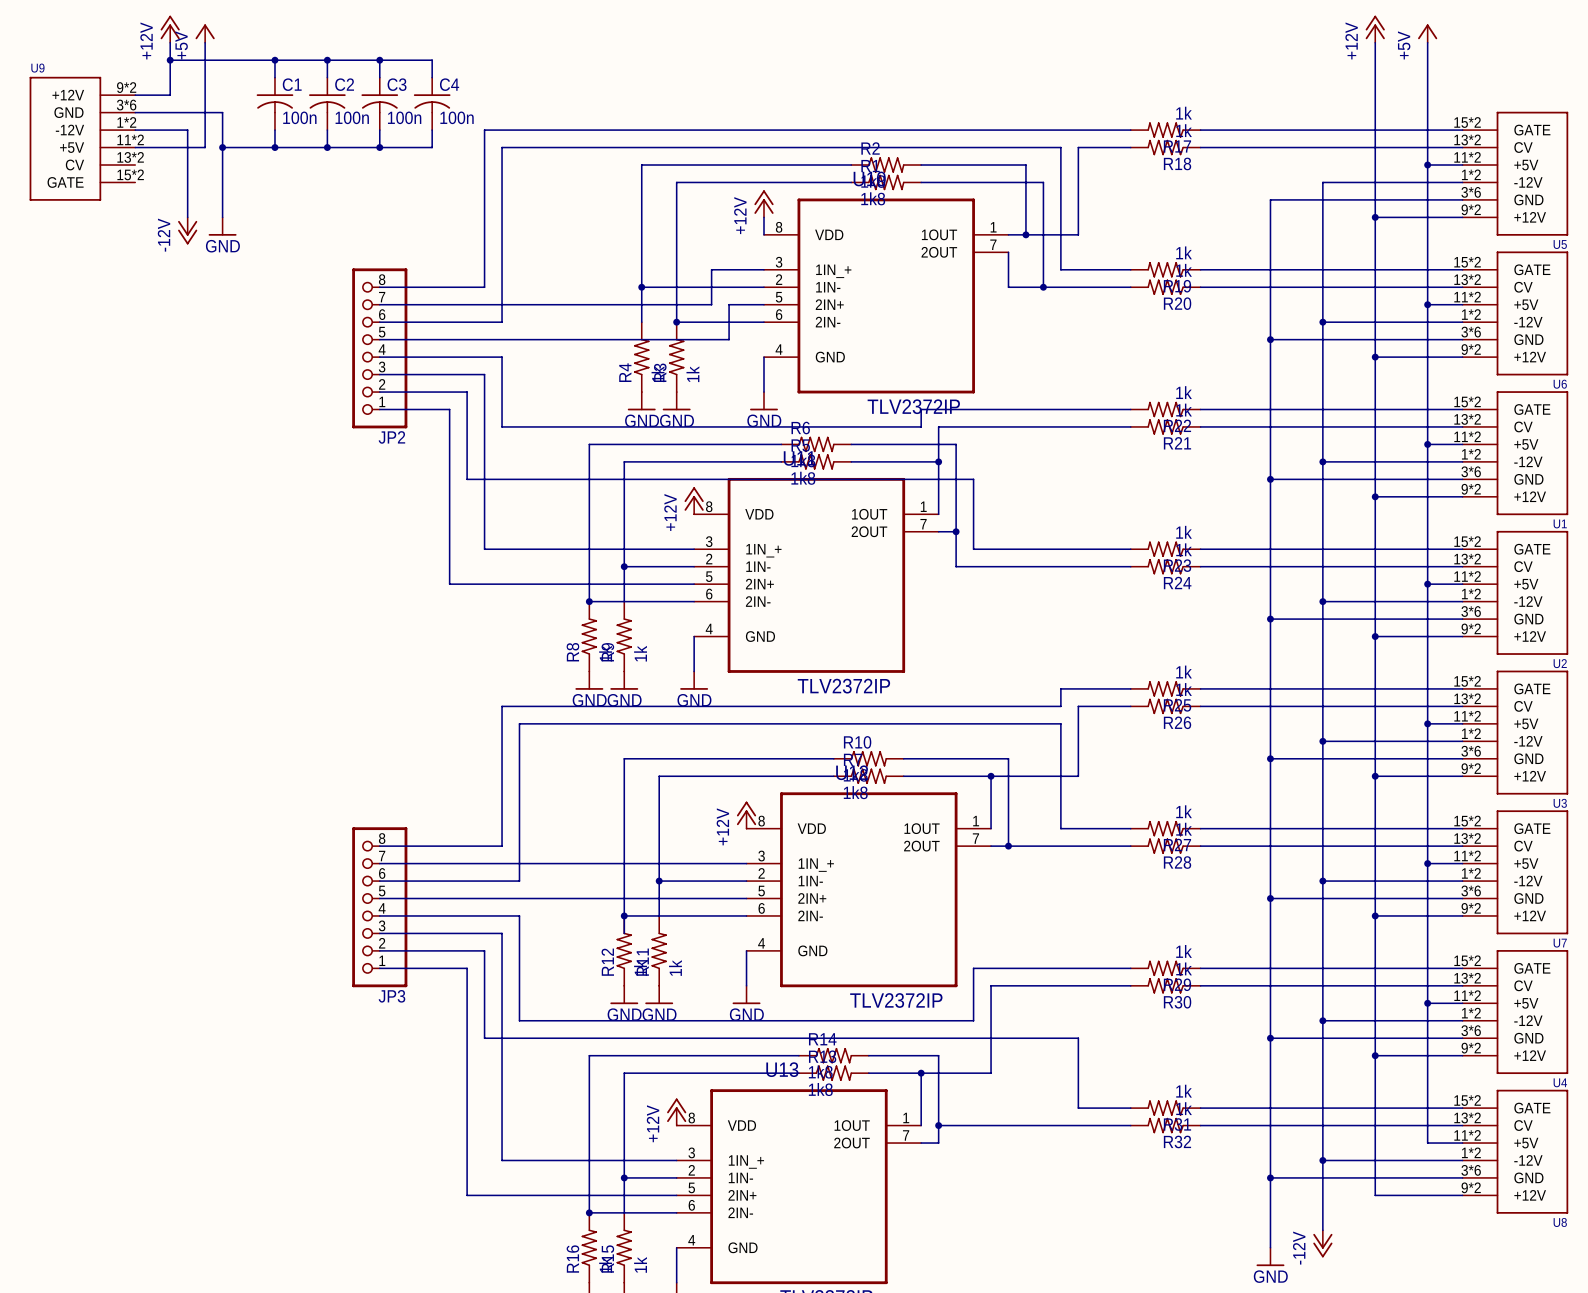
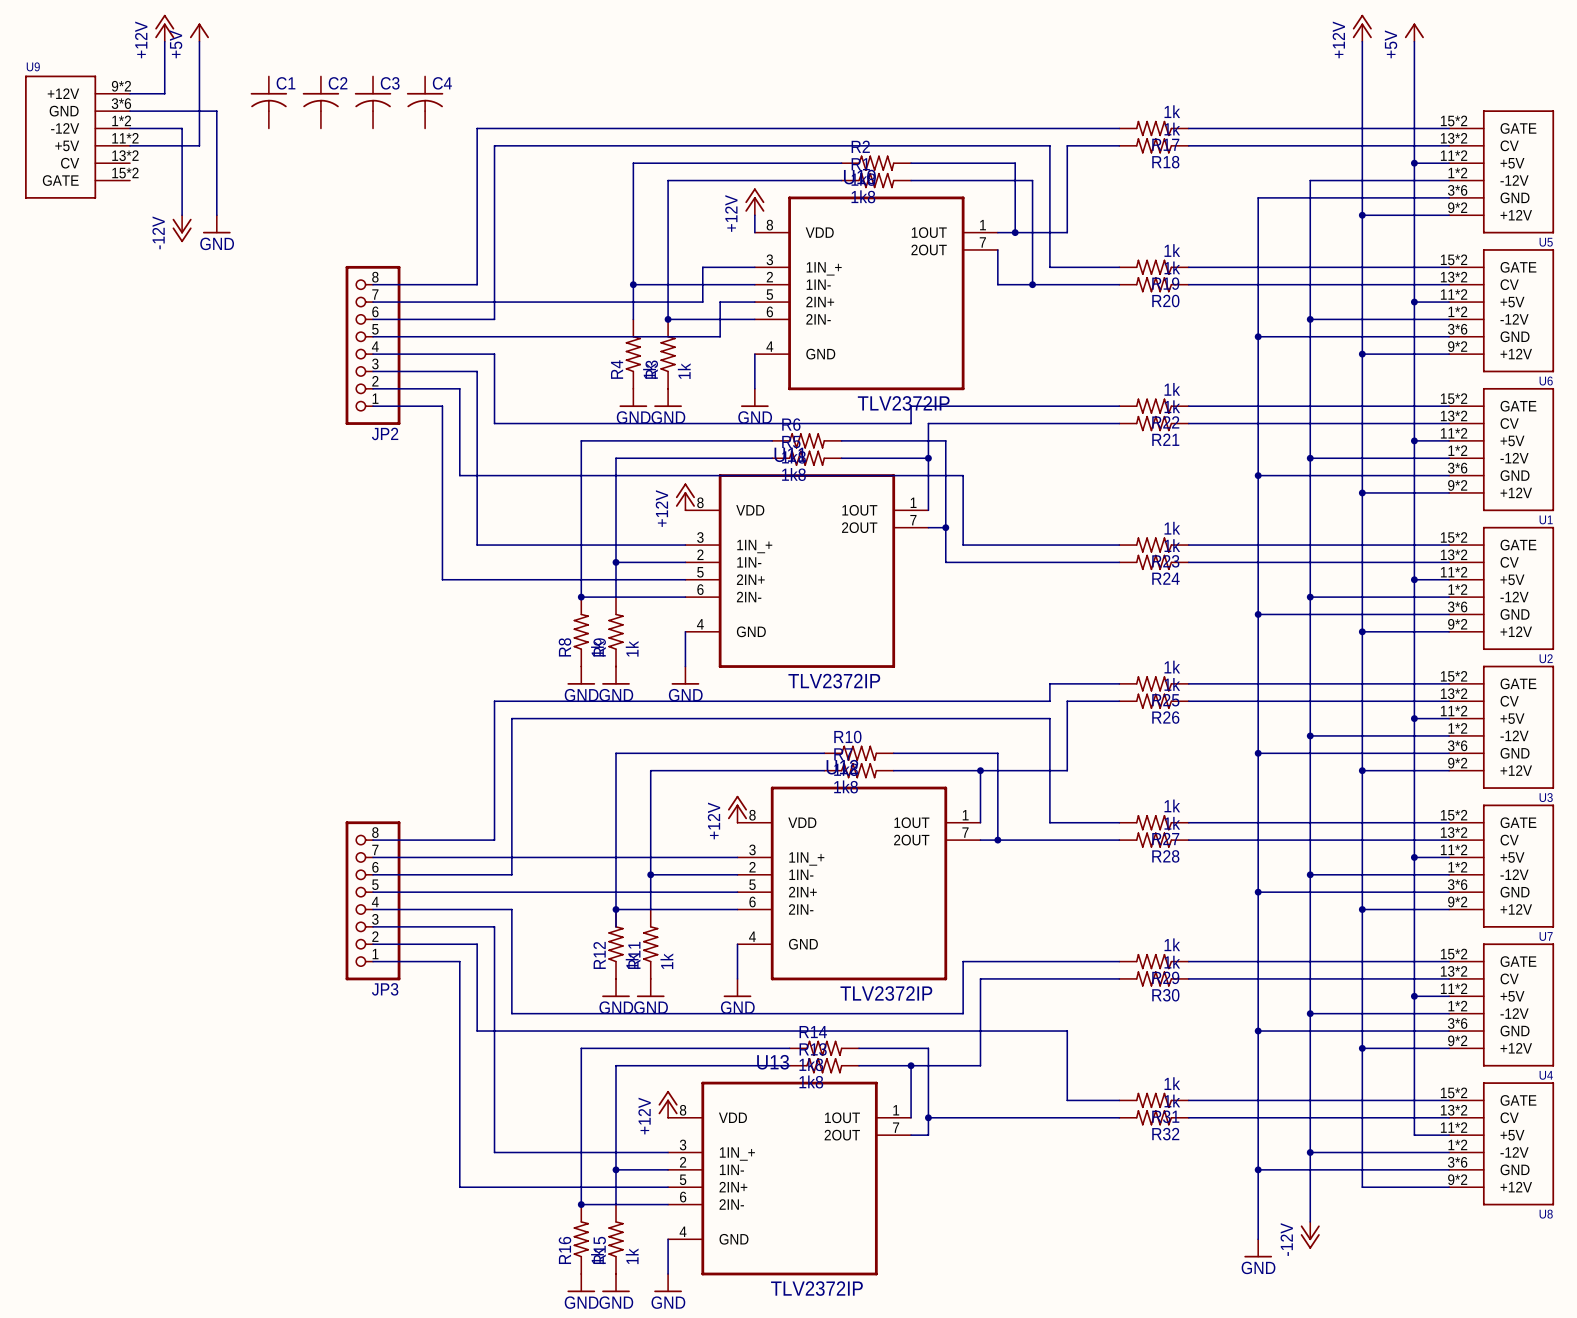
wire: (170, 60) (432, 60) (432, 77) -> none
junction: (170, 60) -> none
wire: (274, 60) (274, 77) -> none
junction: (274, 60) -> none
wire: (327, 60) (327, 77) -> none
junction: (327, 60) -> none
wire: (379, 60) (379, 77) -> none
junction: (379, 60) -> none
C1 value: 100n (299, 117) -> none
C2 value: 100n (352, 117) -> none
C3 value: 100n (404, 117) -> none
C4 value: 100n (457, 117) -> none
wire: (274, 130) (274, 147) -> none
wire: (327, 130) (327, 147) -> none
wire: (379, 130) (379, 147) -> none
wire: (432, 130) (432, 147) (222, 147) -> none
junction: (222, 147) -> none
junction: (274, 147) -> none
junction: (327, 147) -> none
junction: (379, 147) -> none

